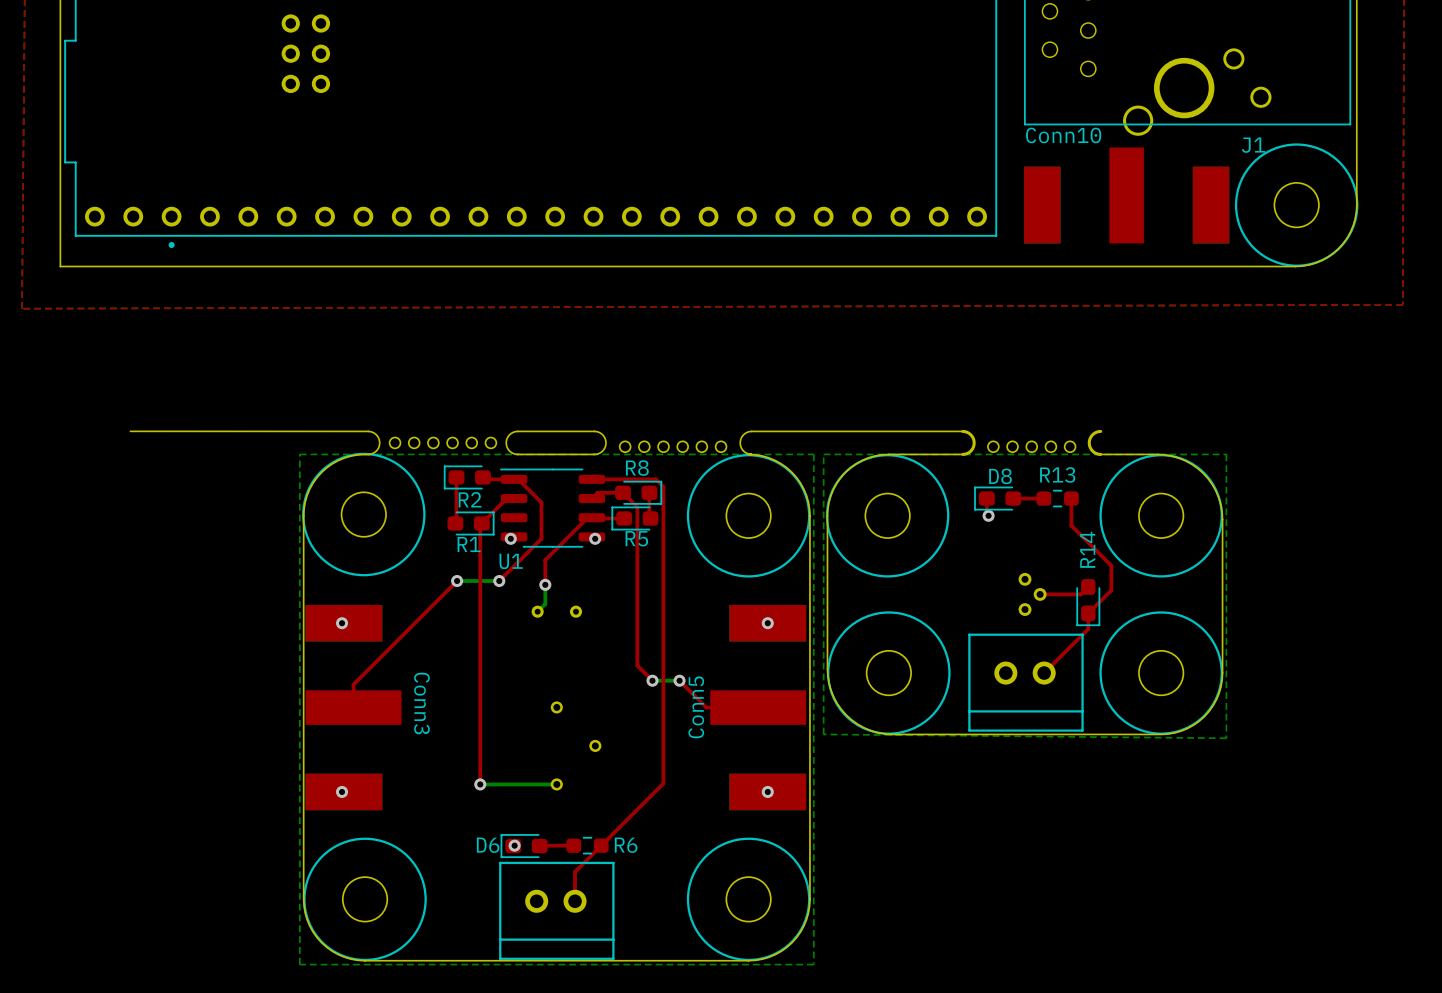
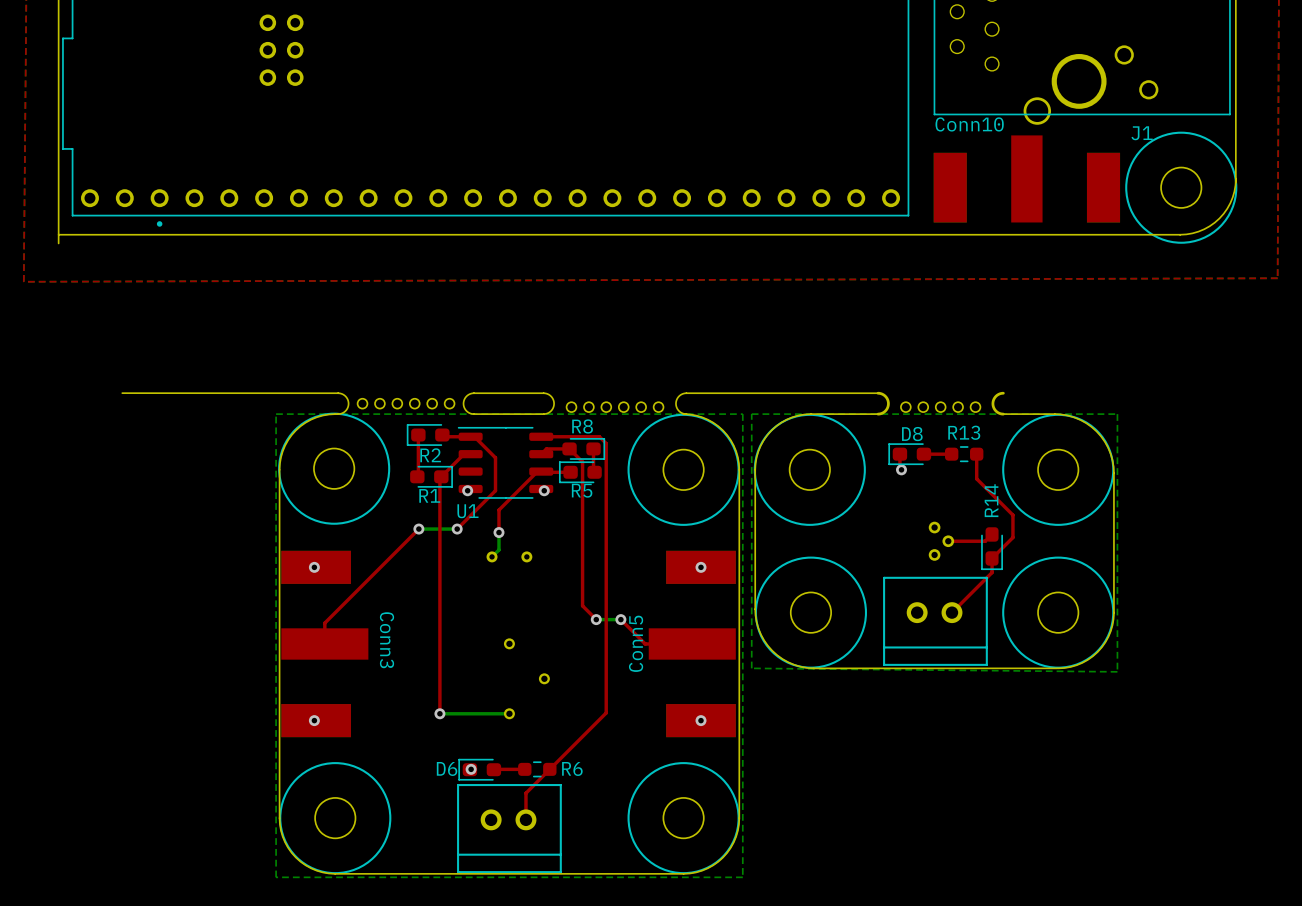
board edge: none -> (1235, 179) (1230, 203) (1219, 218) (1198, 231) (1180, 234) (58, 234)
board edge: (1356, 199) (1353, 225) (1347, 237) (1338, 248) (1328, 257) (1315, 263) (1295, 266) (60, 266) -> none

